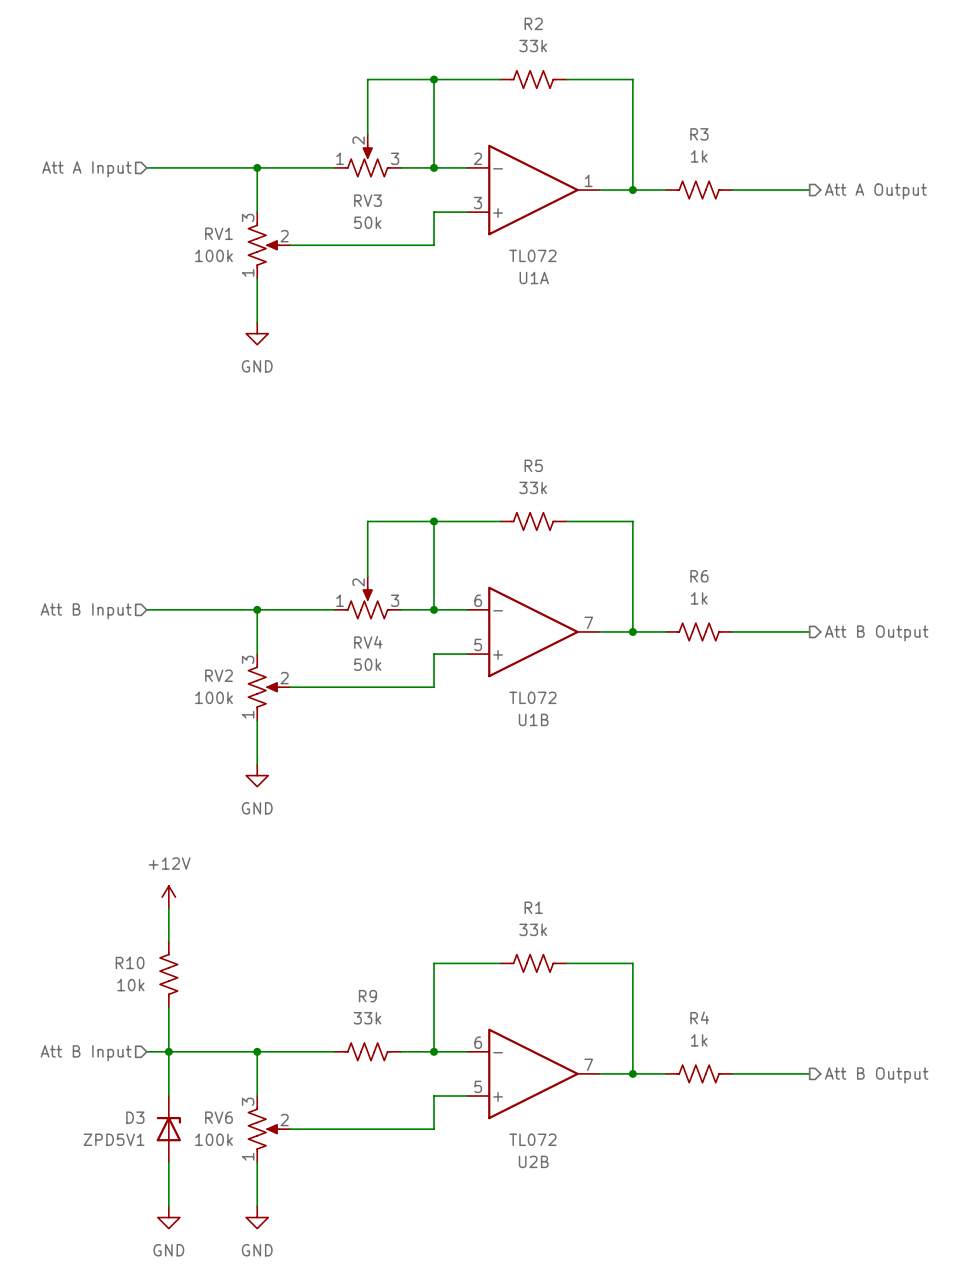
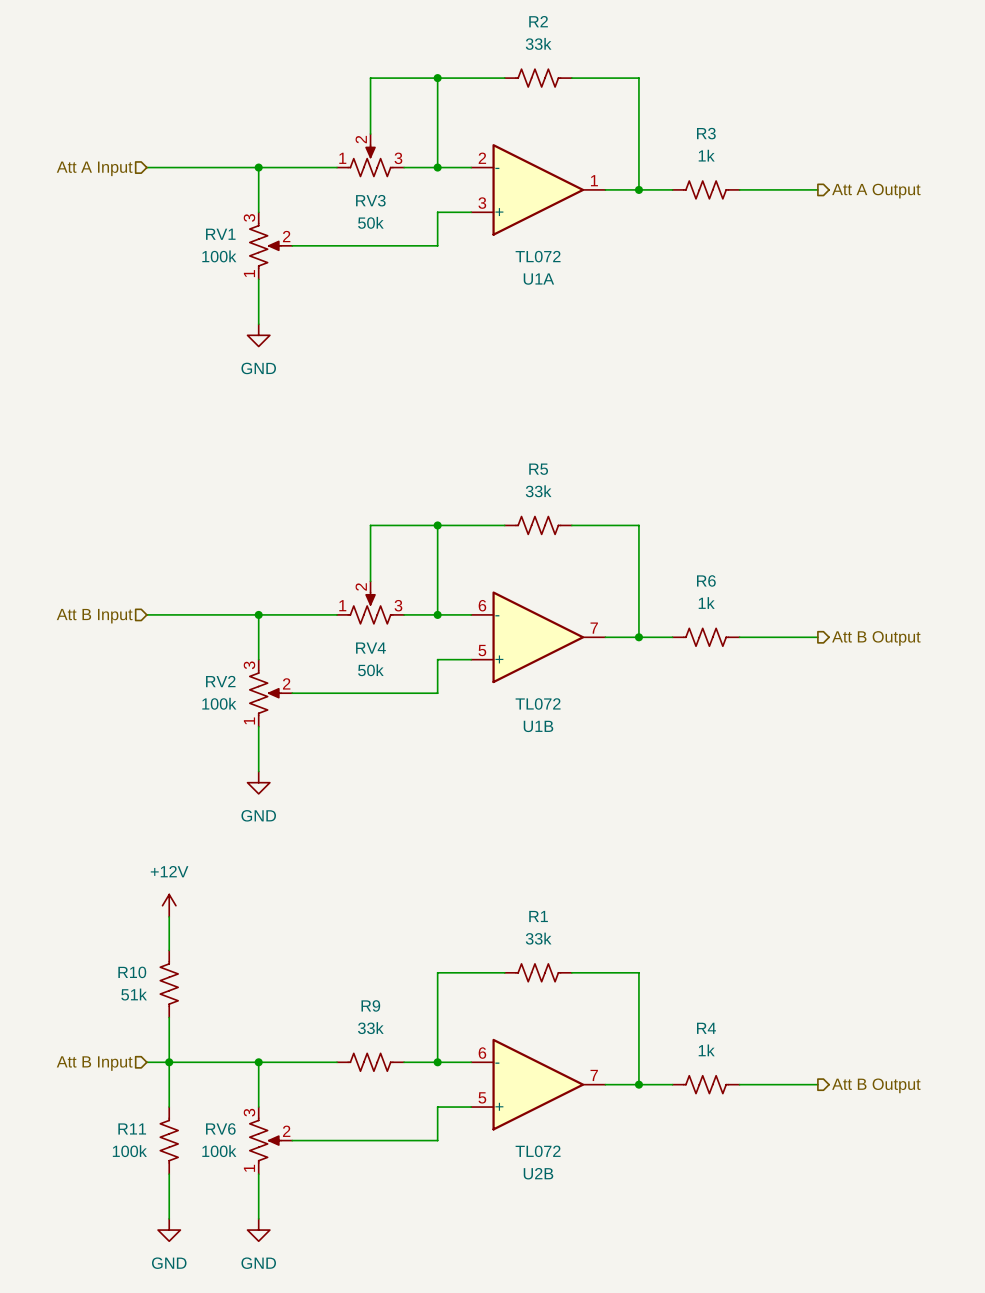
R10 value: 10k (130, 985) -> 51k (134, 994)
D3: ZPD5V1 (168, 1129) -> none
R11: none -> 100k (169, 1140)

